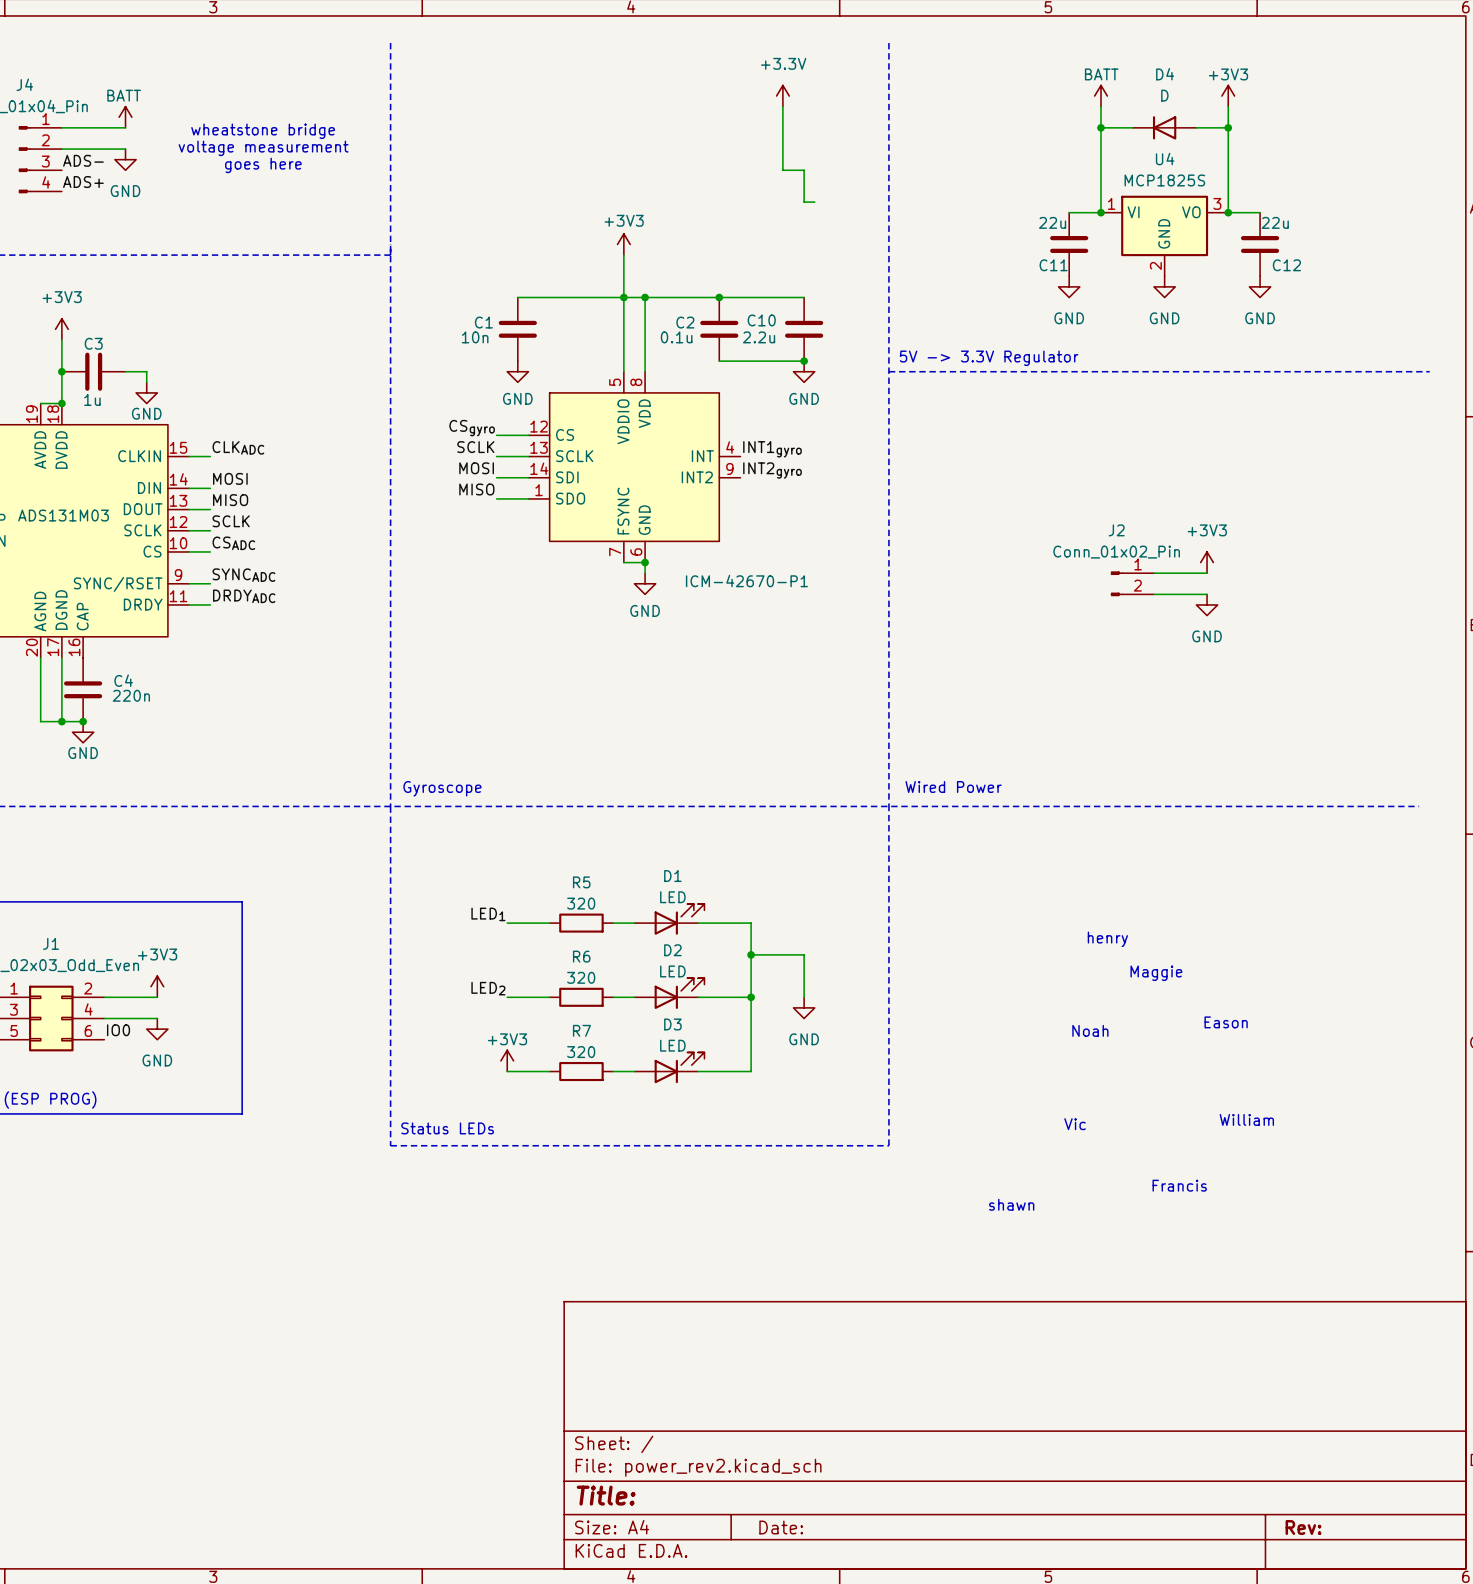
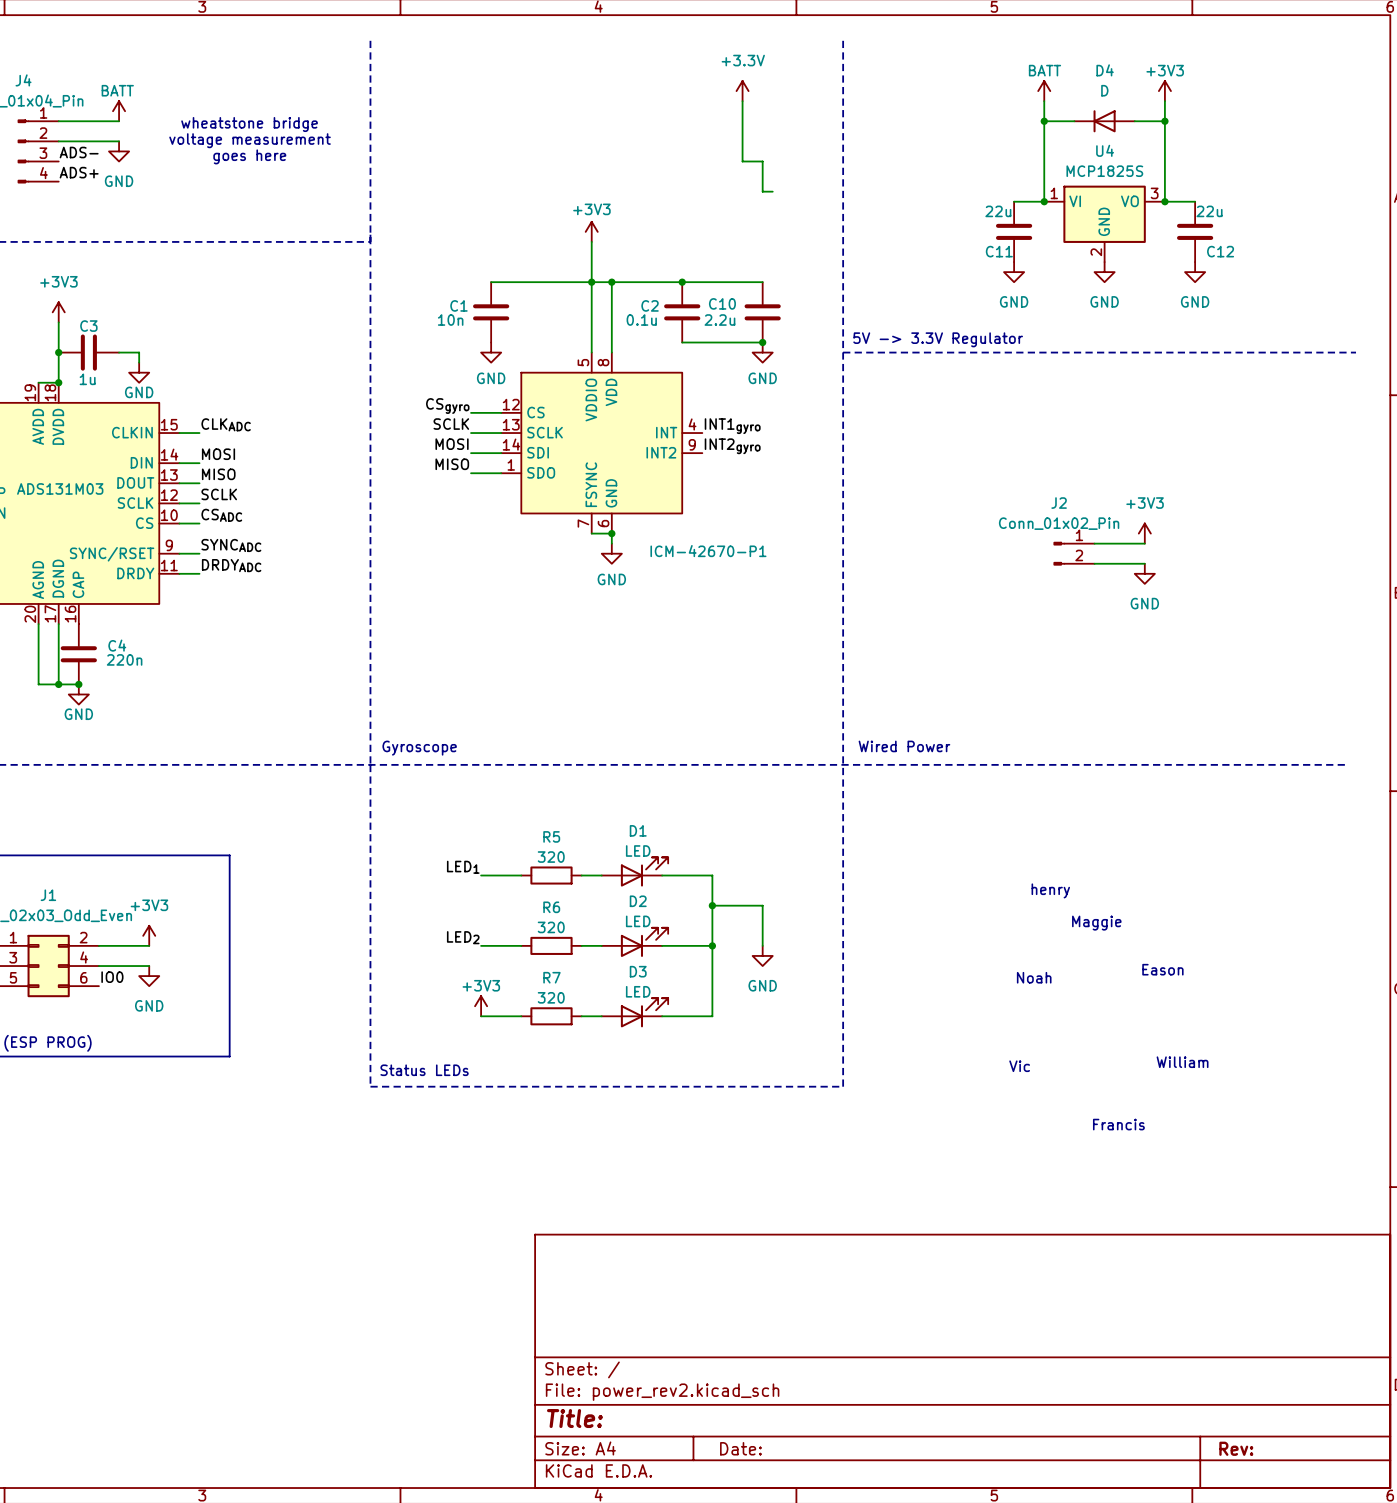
text: shawn (1011, 1204) -> none

